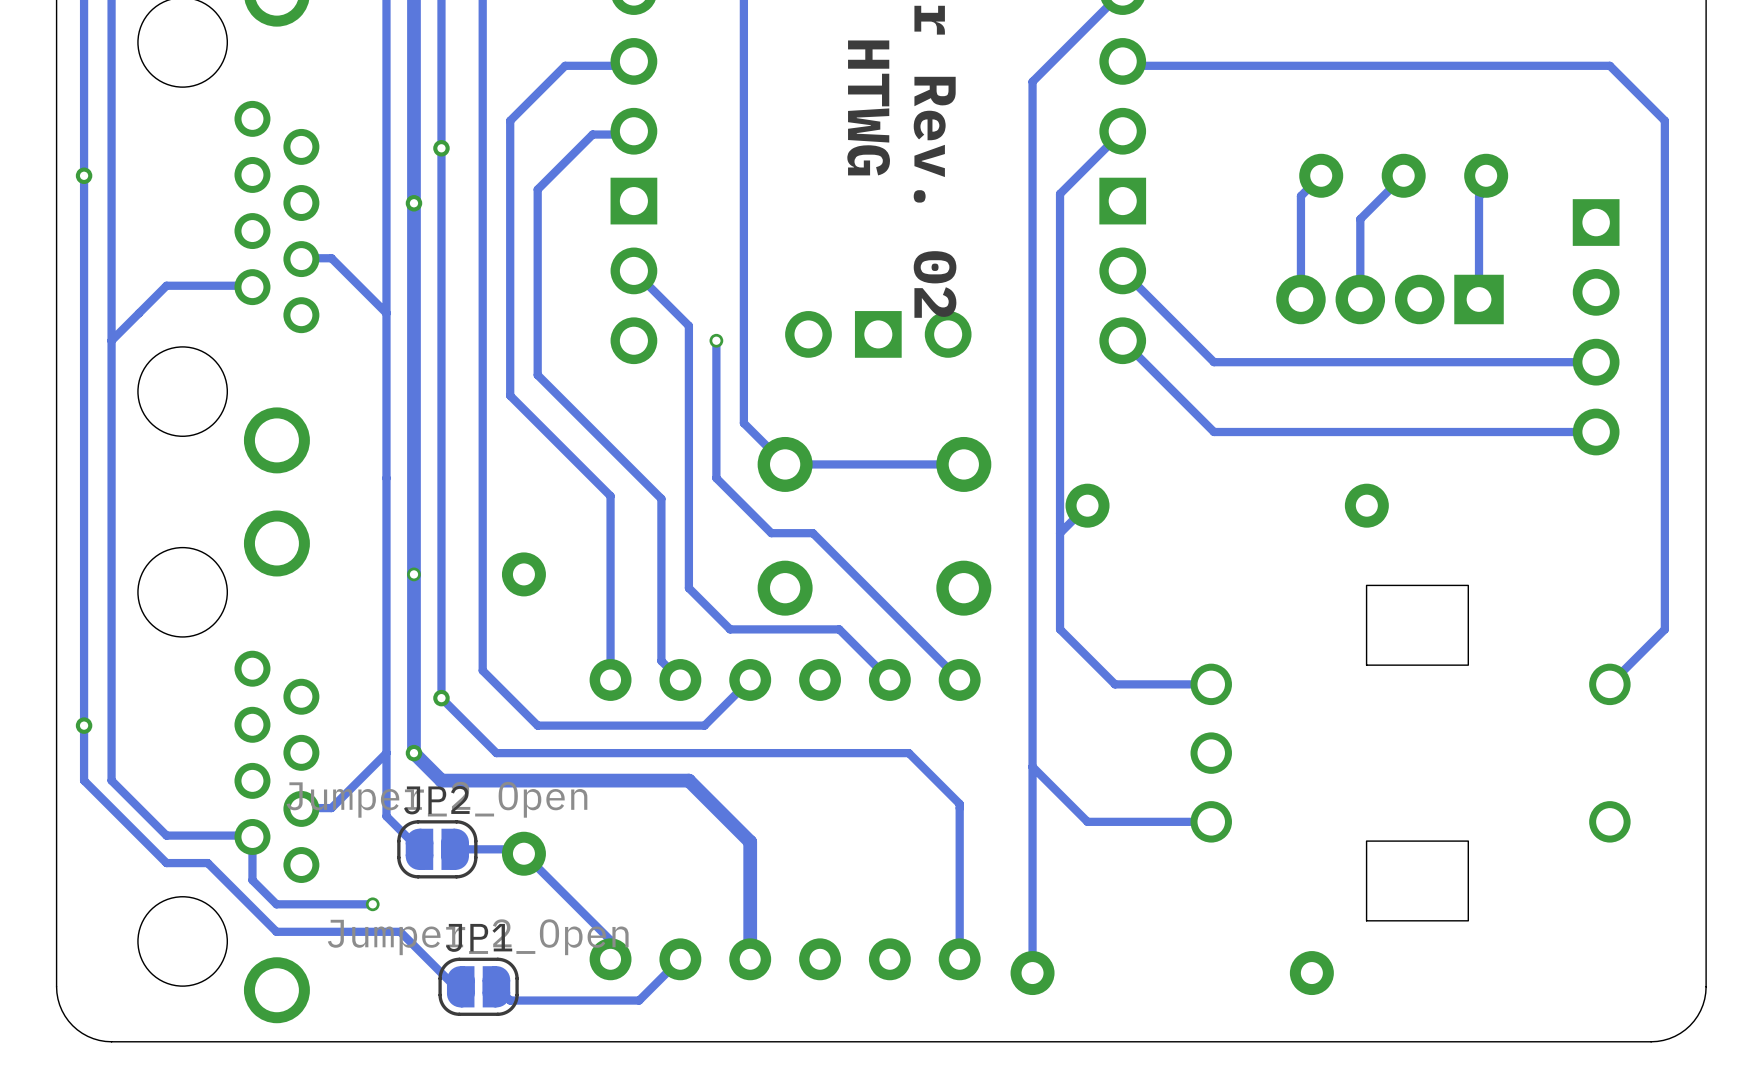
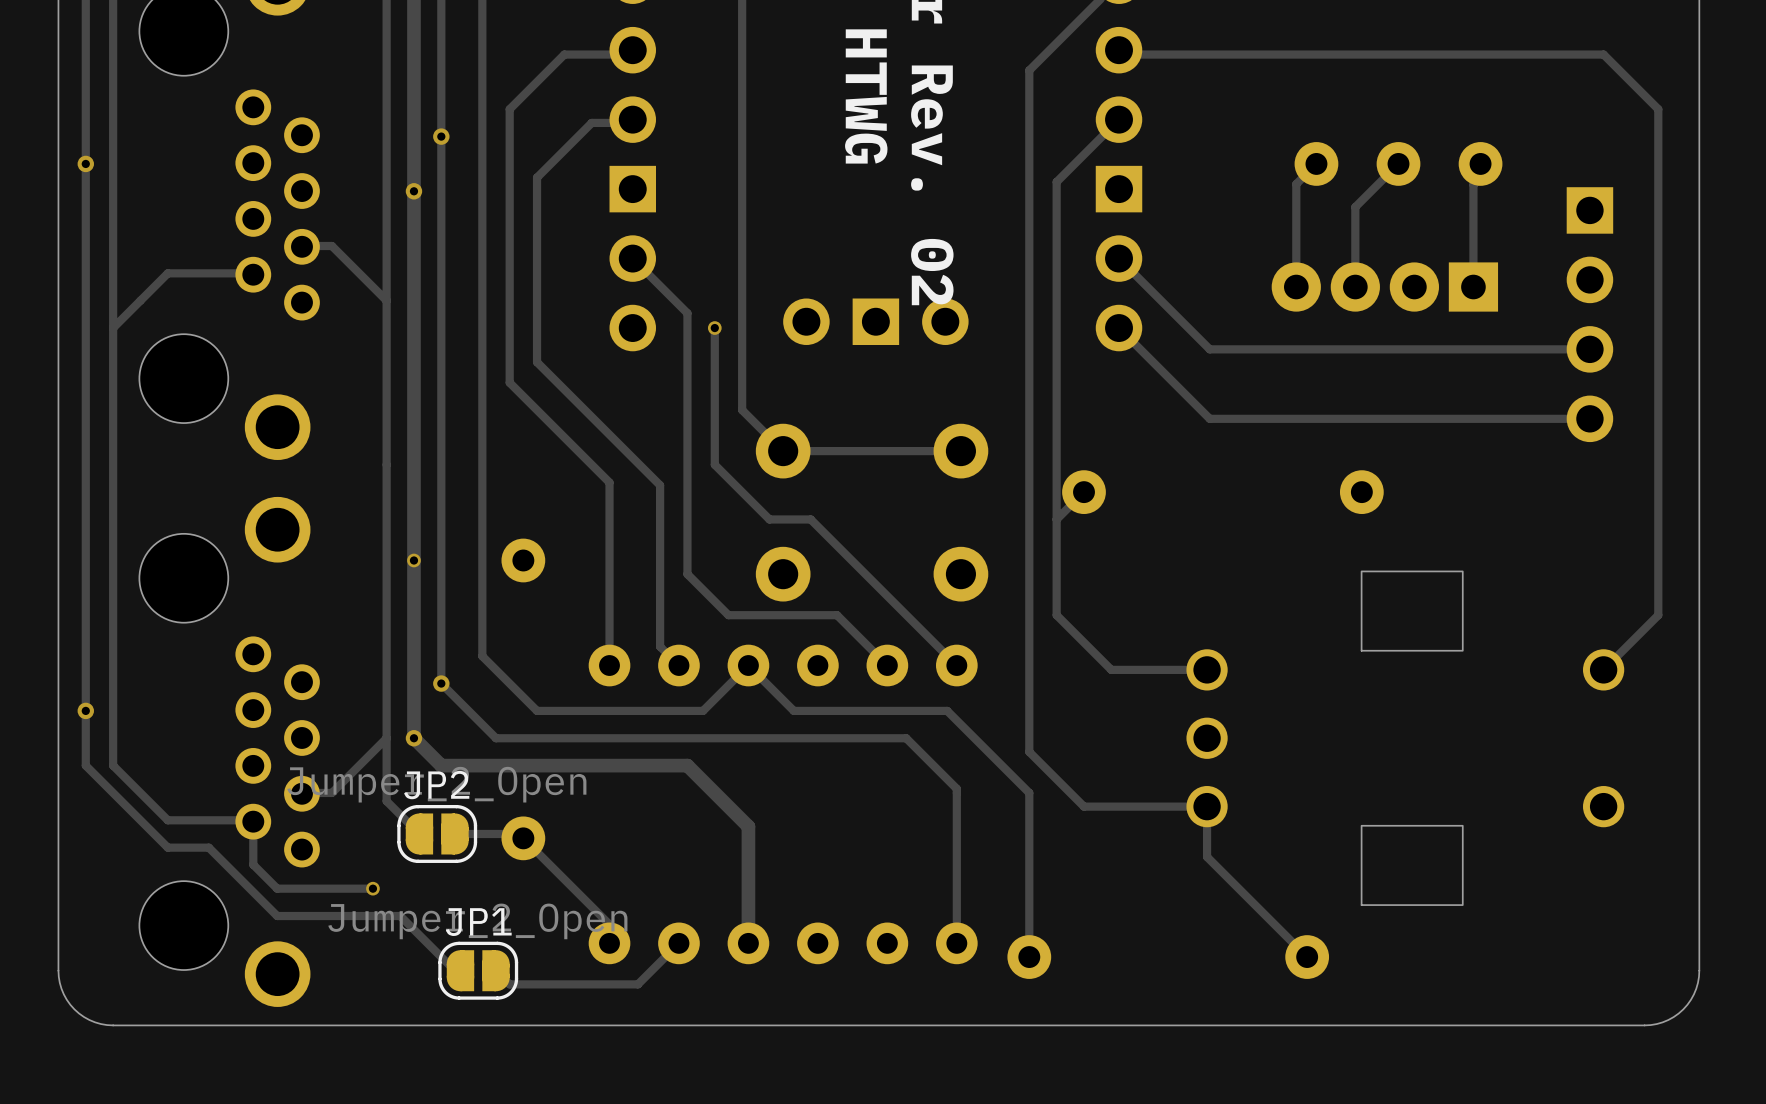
track: (1032, 766) (1032, 808) -> (748, 665) (793, 710) (947, 710) (1029, 792)
track: none -> (1207, 806) (1207, 856) (1307, 957)

